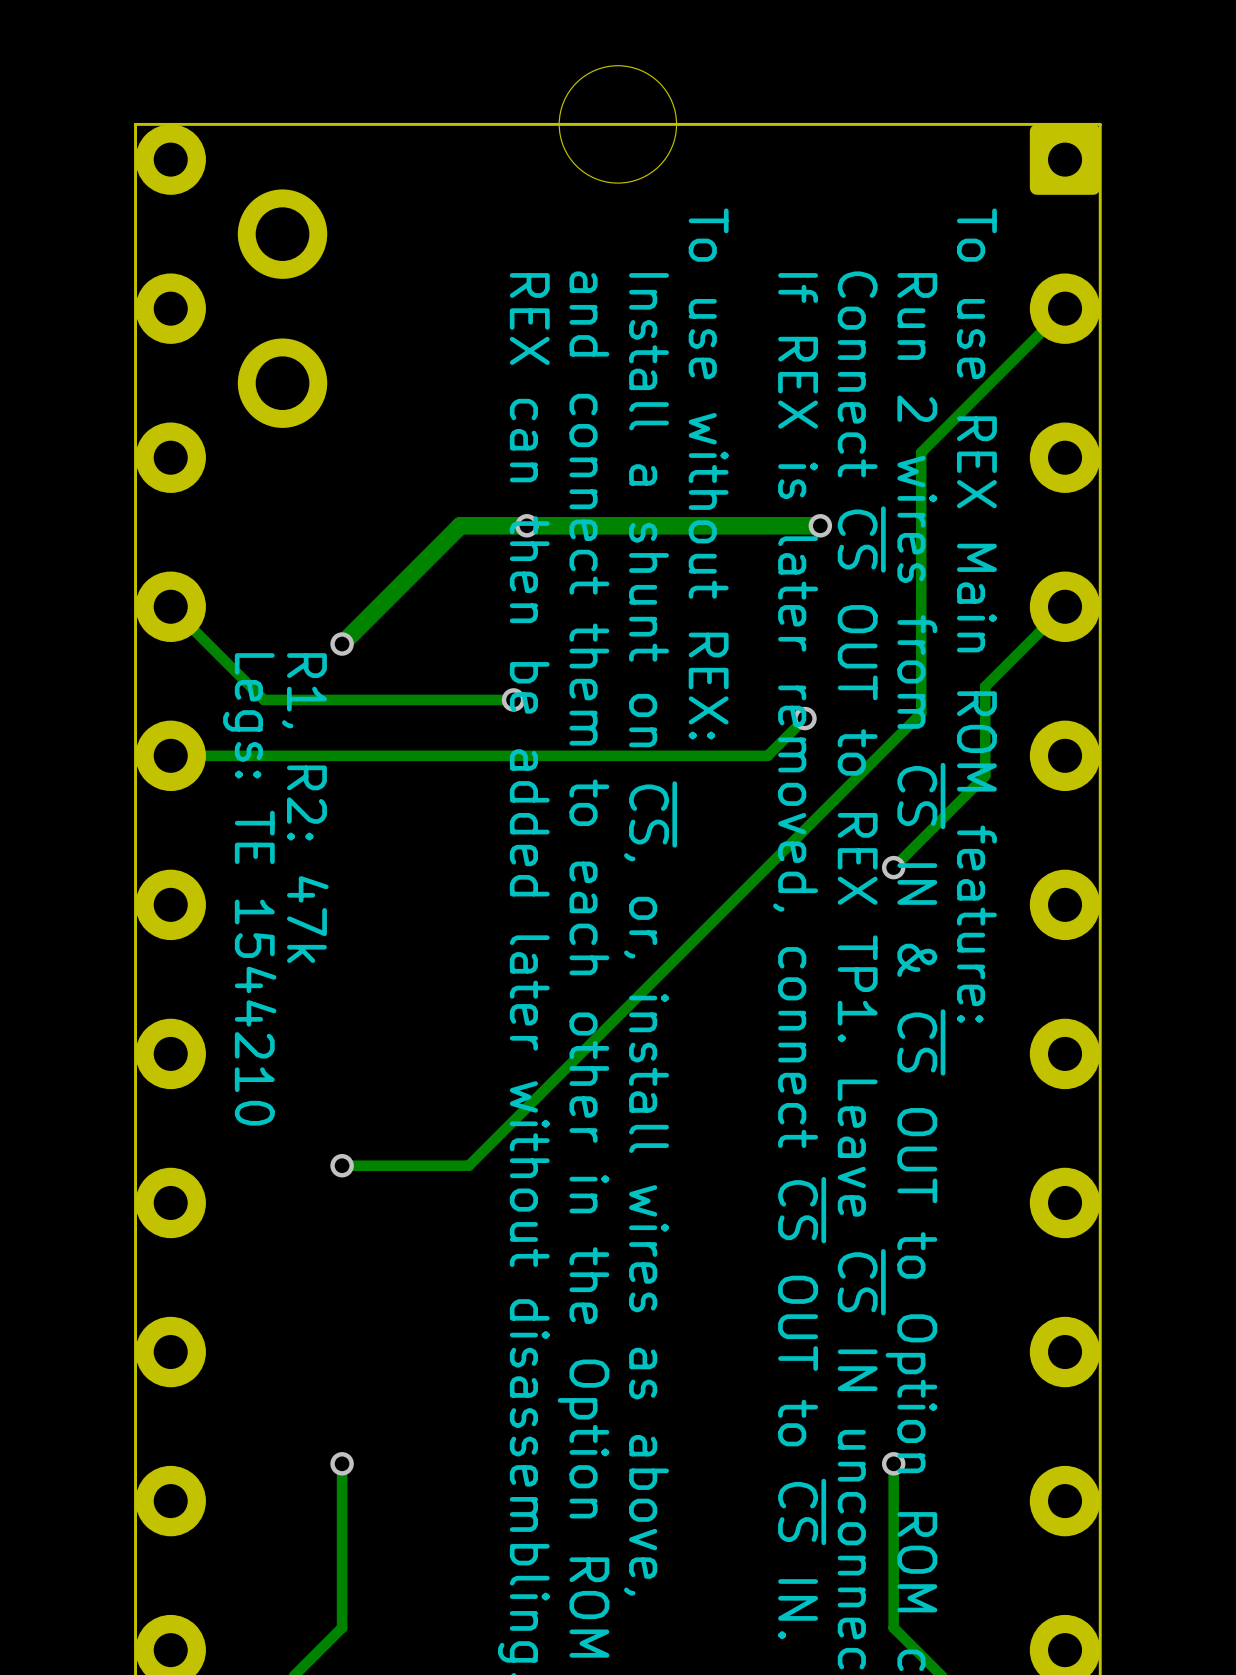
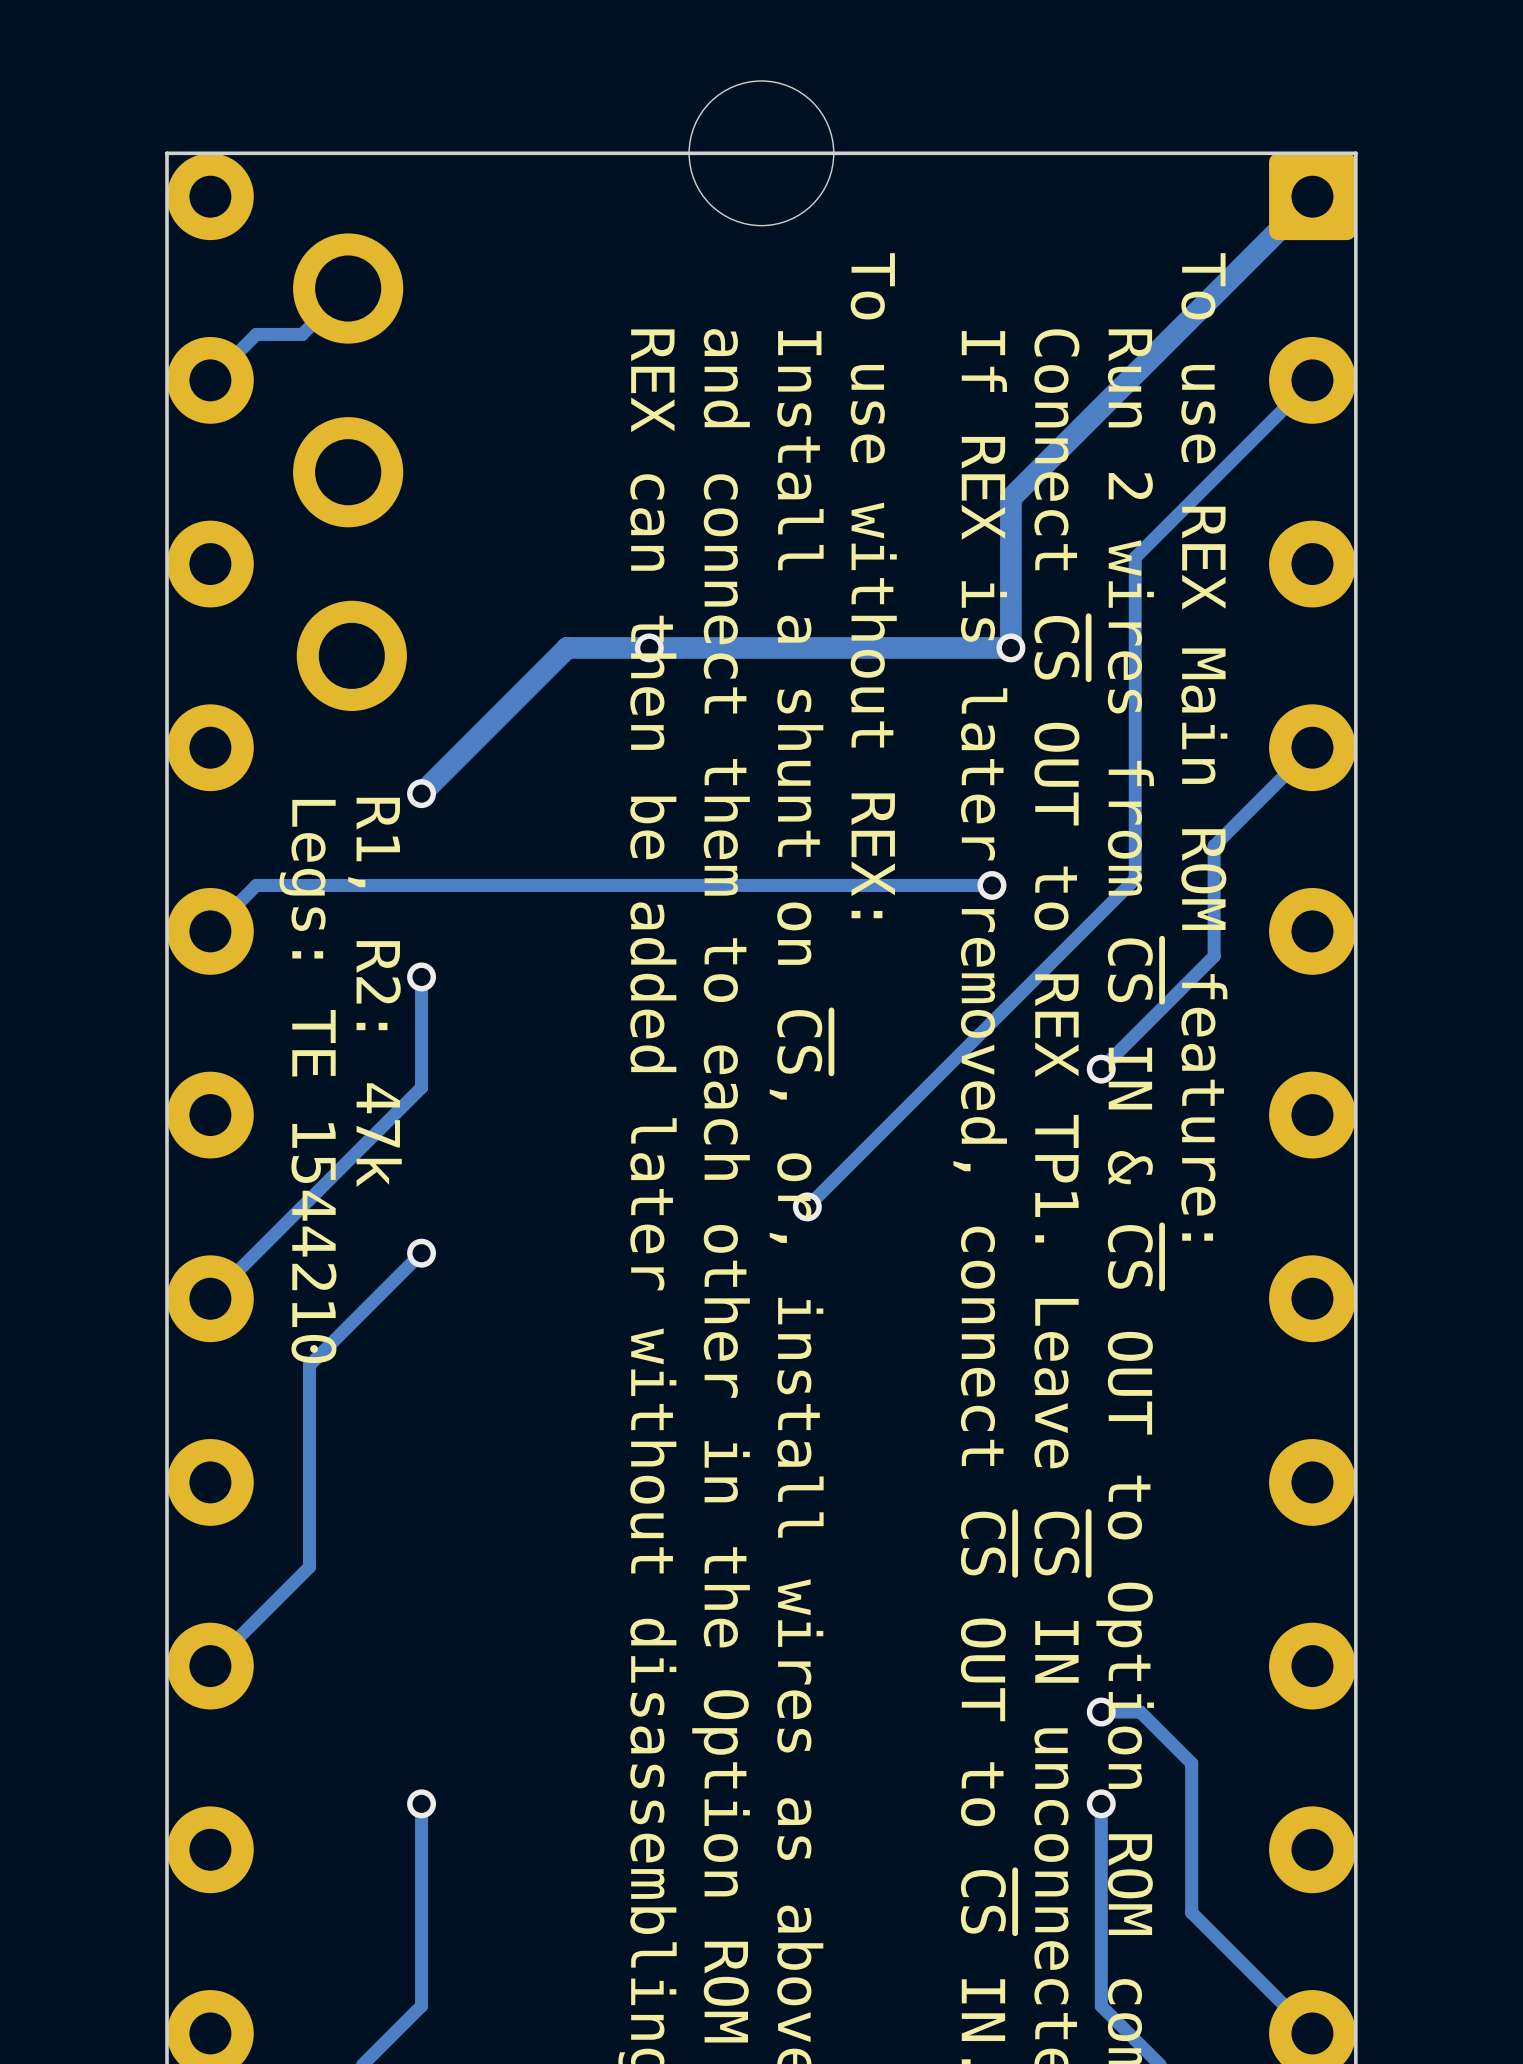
track: none -> (1312, 196) (1010, 498) (1010, 647)
track: none -> (348, 288) (302, 334) (256, 334) (210, 380)
part: none -> (351, 655)
track: (170, 606) (263, 699) (513, 699) -> none
via: (513, 699) -> none
track: (804, 718) (767, 755) (170, 755) -> (991, 885) (256, 885) (210, 931)
track: none -> (421, 976) (421, 1087) (210, 1298)
via: none -> (421, 976)
track: (655, 979) (468, 1165) (342, 1165) -> none
via: none -> (807, 1206)
track: none -> (421, 1253) (309, 1365) (309, 1567) (210, 1666)
via position: (342, 1165) -> (421, 1253)
track: none -> (1101, 1712) (1140, 1712) (1191, 1763) (1191, 1912) (1312, 2033)
via: none -> (1101, 1712)

